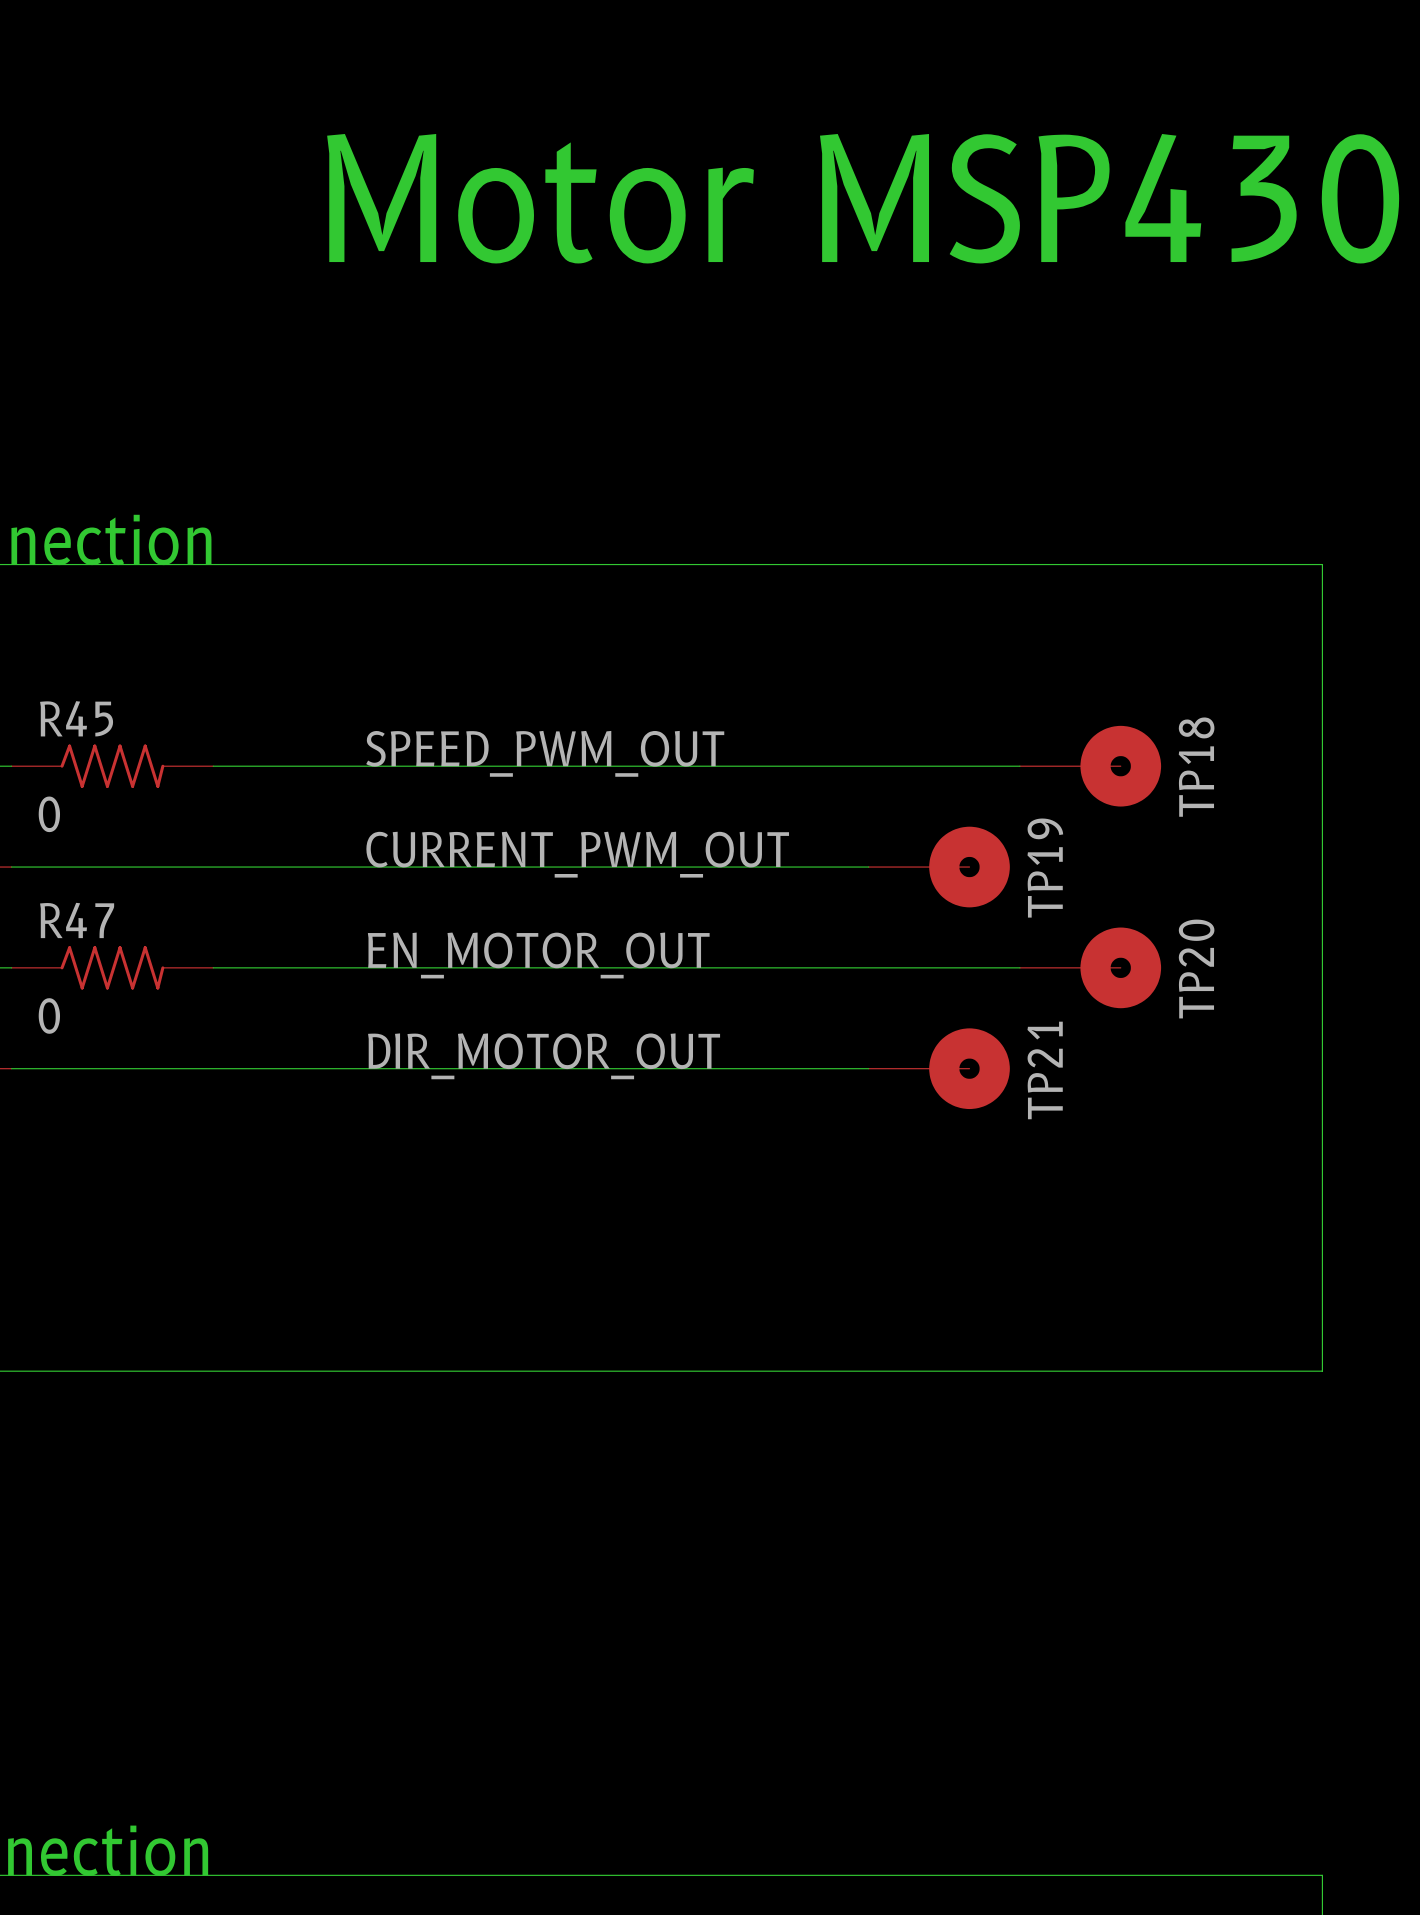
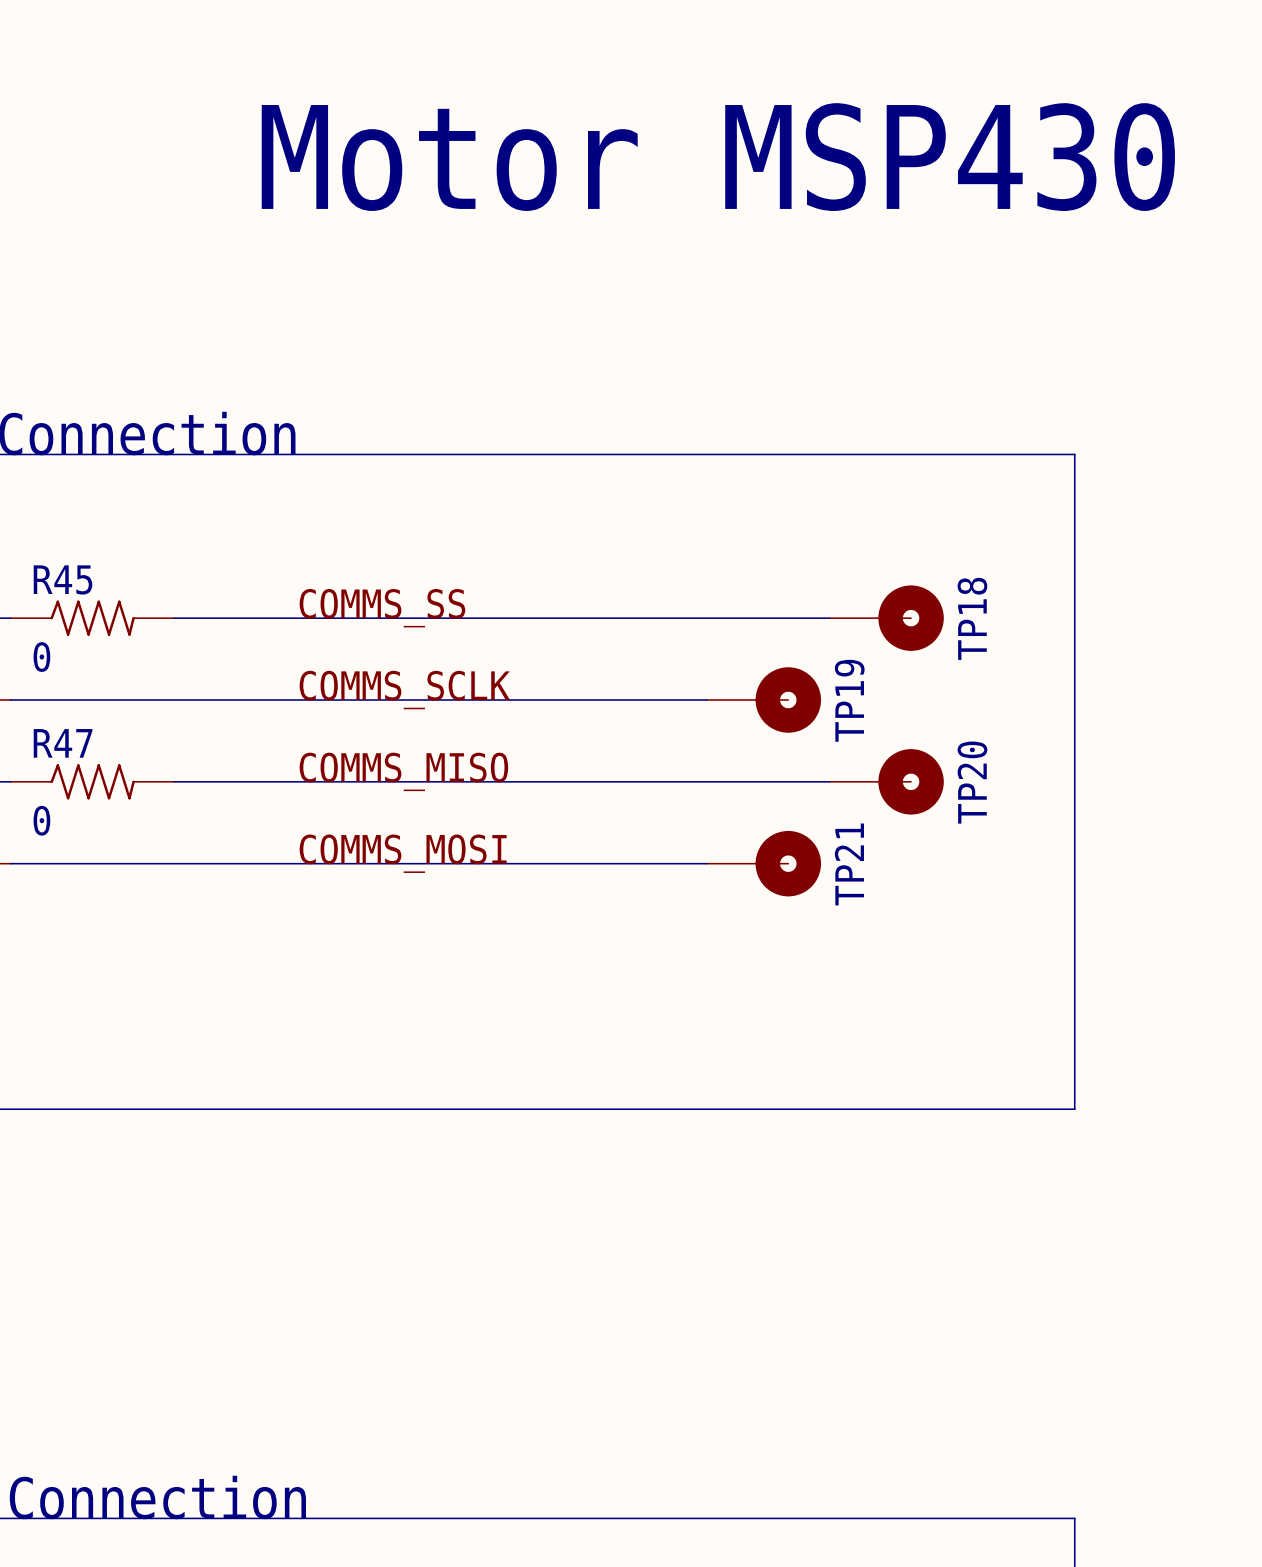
label: SPEED_PWM_OUT (545, 753) -> COMMS_SS (382, 608)
label: CURRENT_PWM_OUT (577, 854) -> COMMS_SCLK (404, 690)
label: EN_MOTOR_OUT (538, 955) -> COMMS_MISO (403, 771)
label: DIR_MOTOR_OUT (544, 1056) -> COMMS_MOSI (403, 853)

